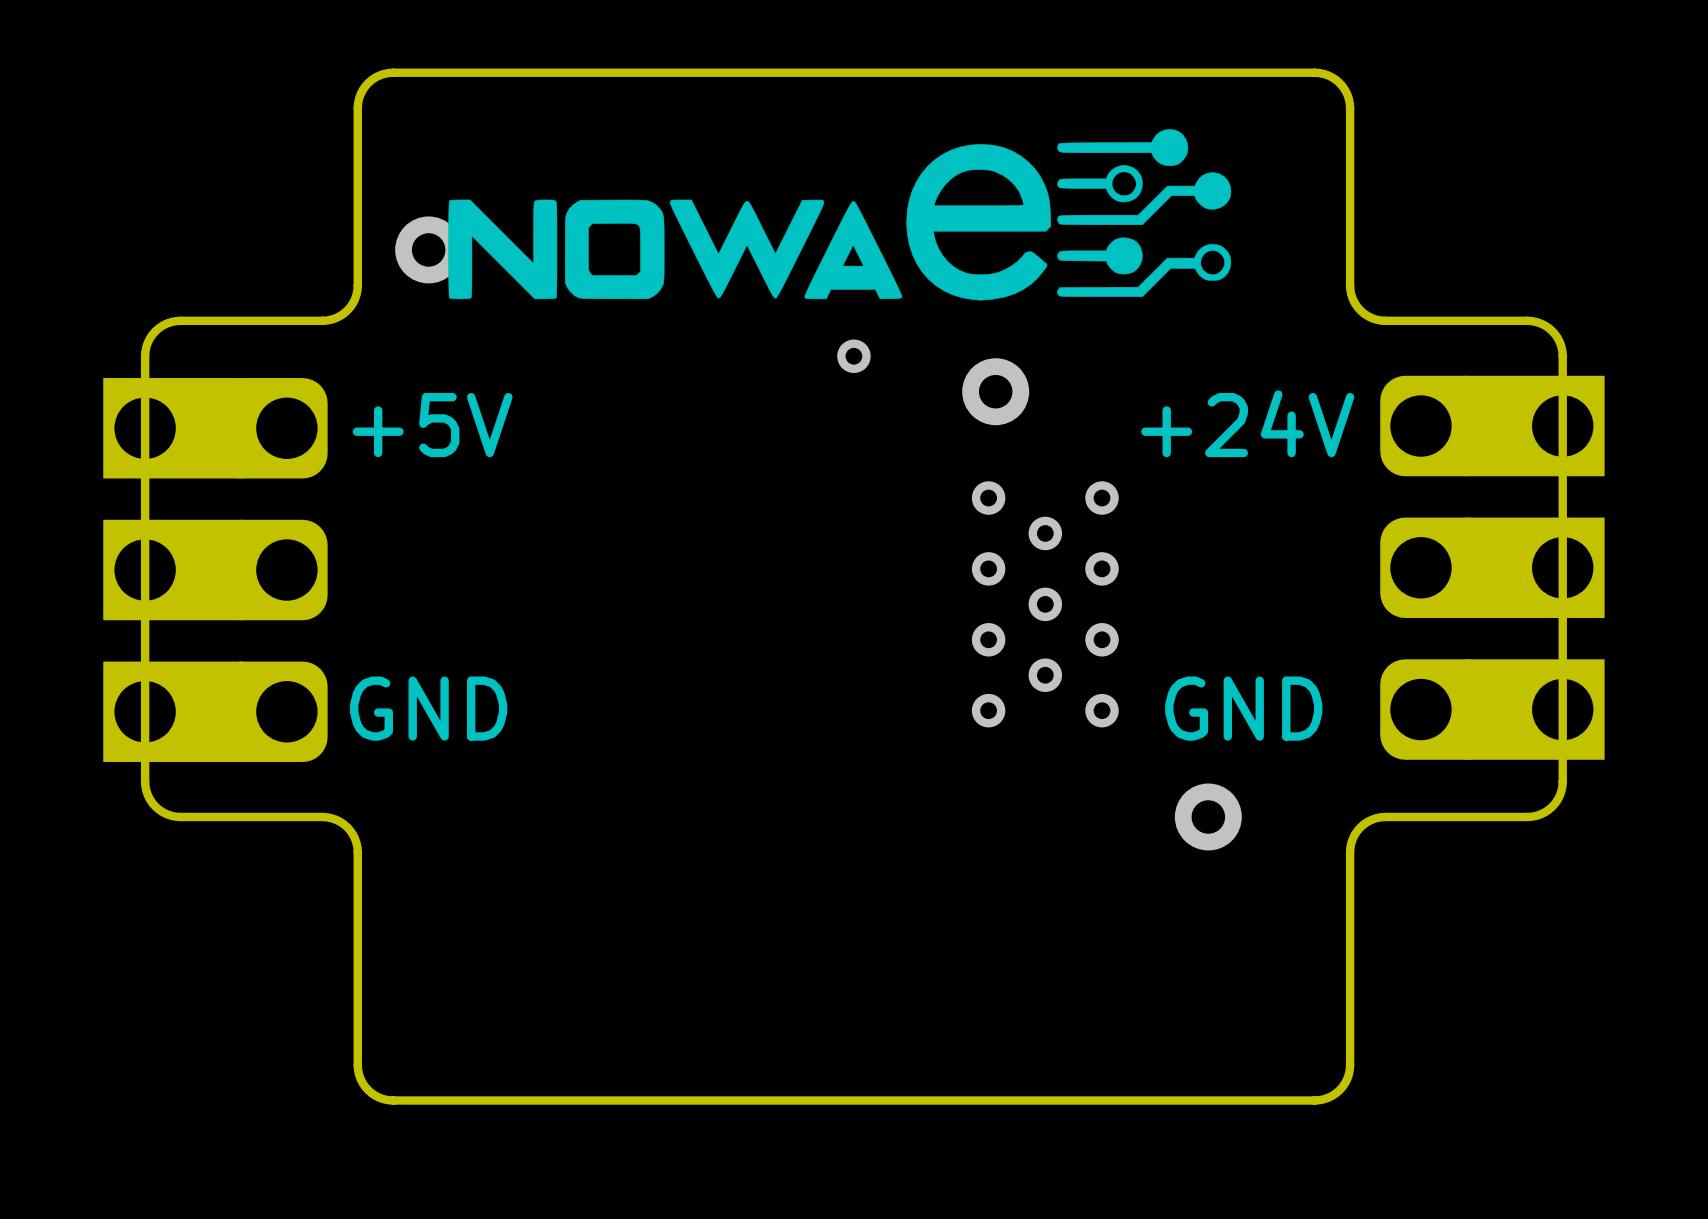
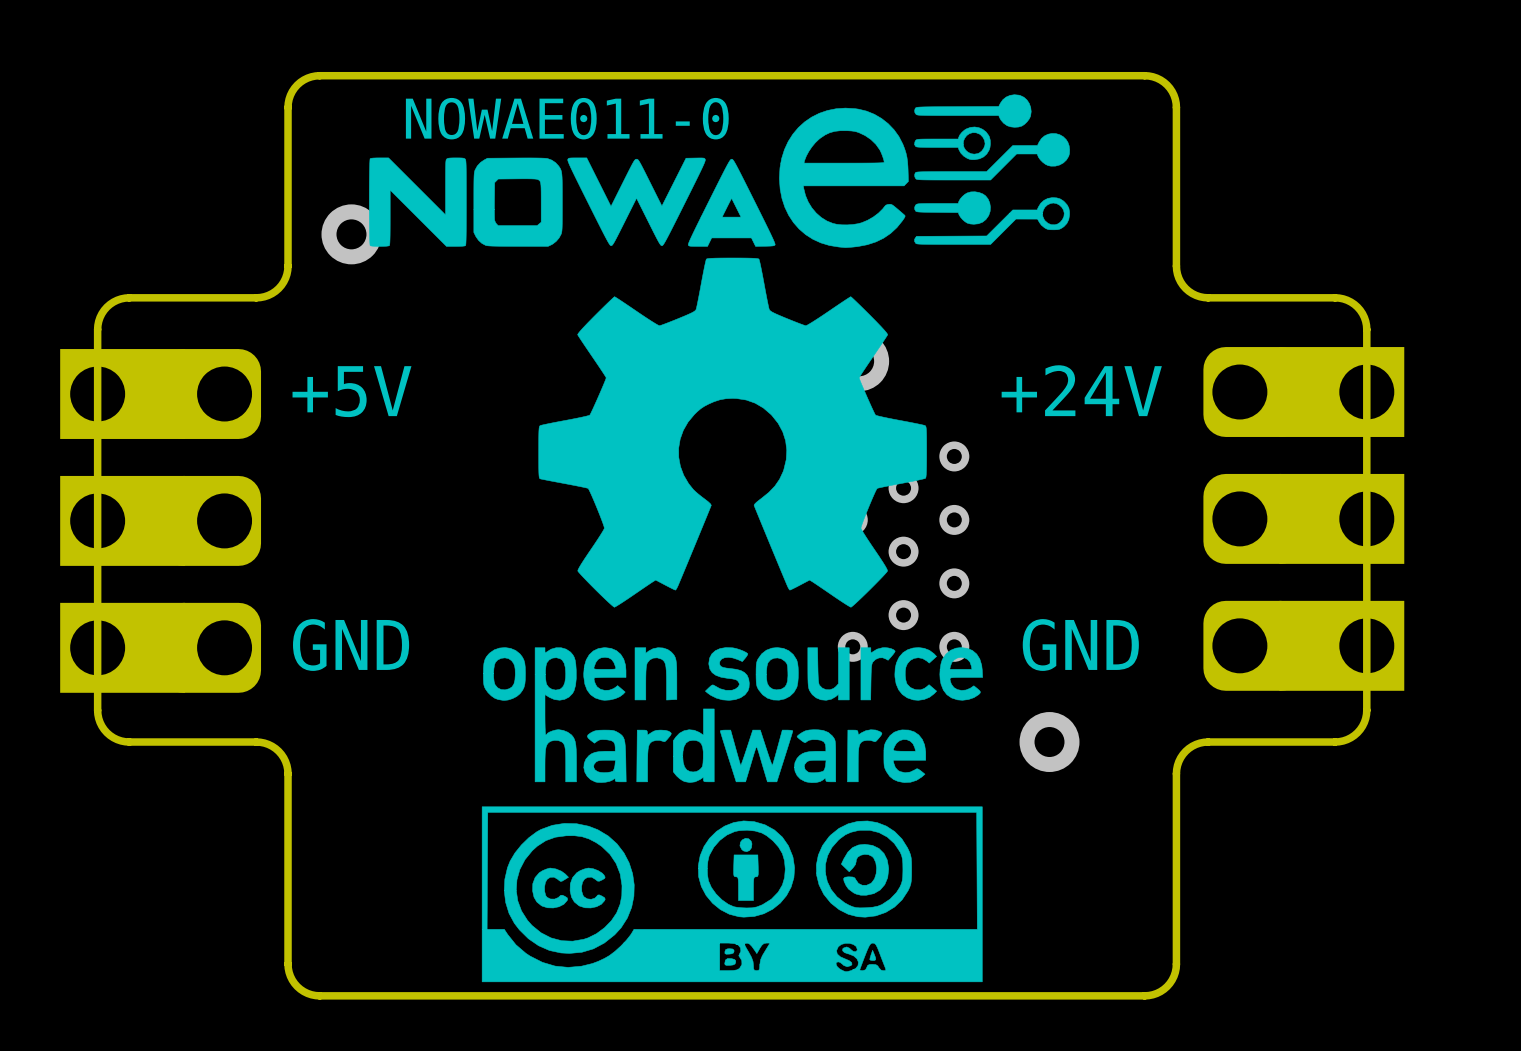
text: none -> NOWAE011-0 (567, 118)
drawing position: (839, 214) -> (719, 171)
drawing: none -> [481, 257, 983, 983]

